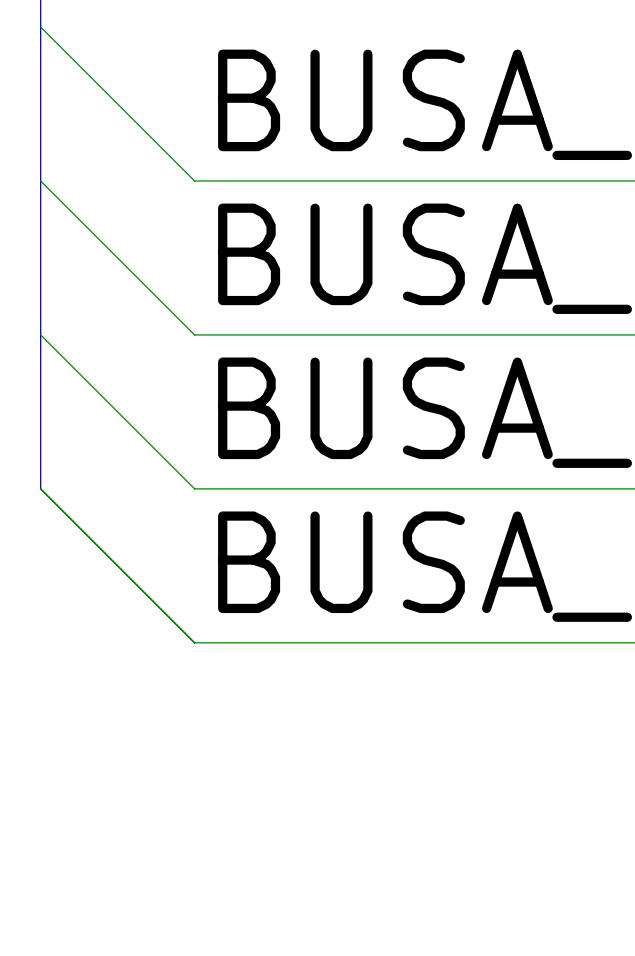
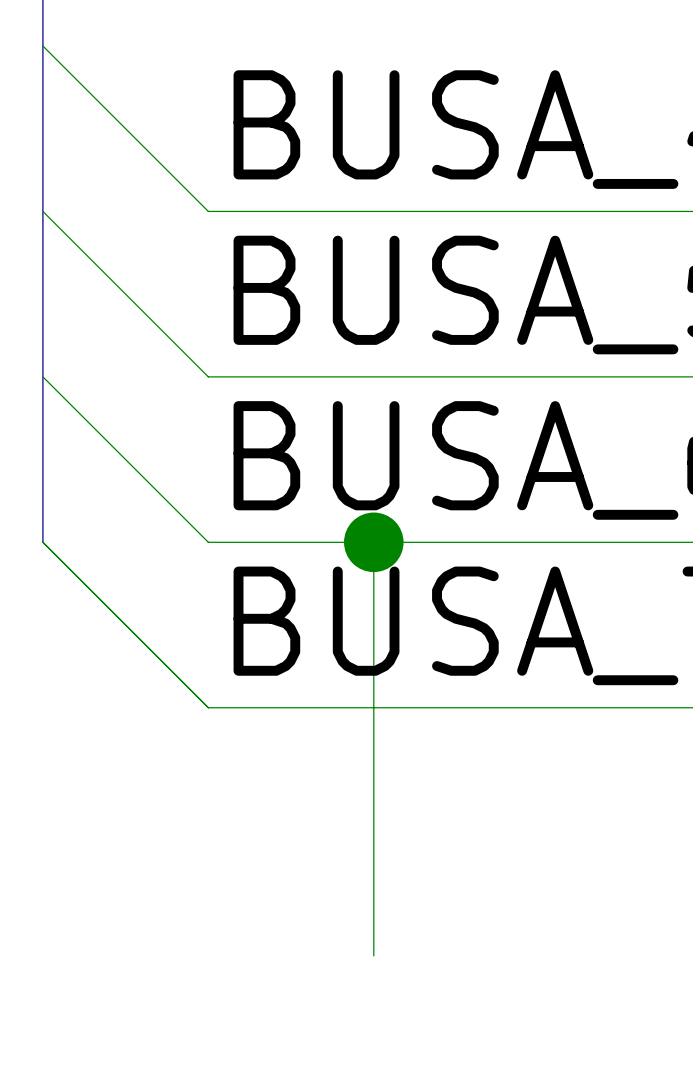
wire: none -> (373, 542) (373, 955)
junction: none -> (373, 542)

